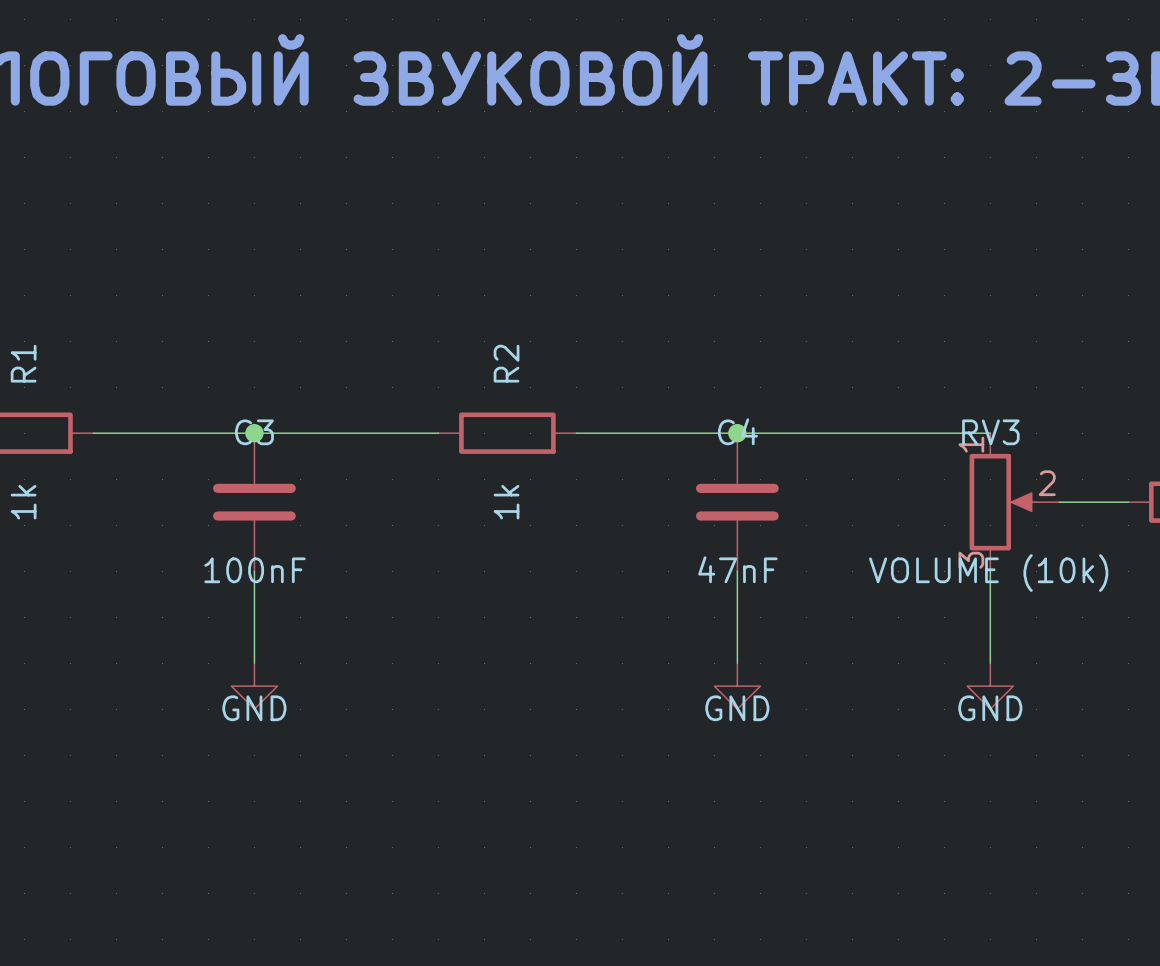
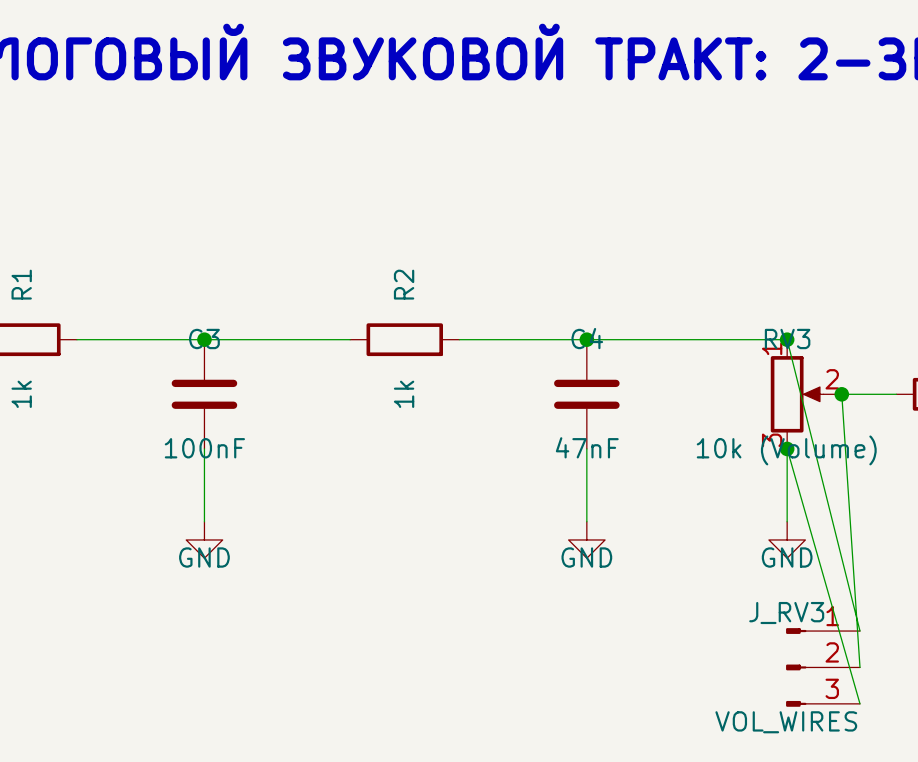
wire: none -> (787, 339) (859, 631)
junction: none -> (787, 339)
wire: none -> (841, 394) (859, 667)
junction: none -> (841, 394)
wire: none -> (787, 448) (859, 703)
junction: none -> (787, 448)
RV3 value: VOLUME (10k) (988, 573) -> 10k (Volume) (786, 450)
J_RV3: none -> VOL_WIRES (823, 667)

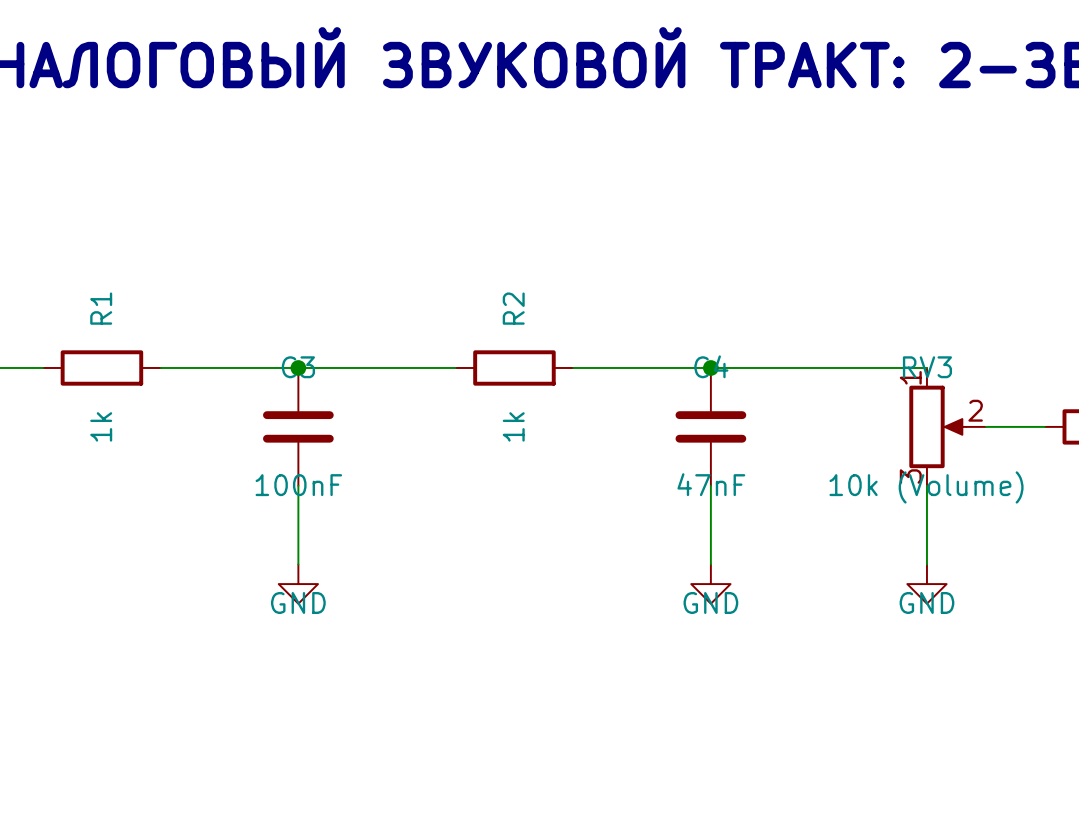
wire: (787, 339) (859, 631) -> none
junction: (787, 339) -> none
wire: (841, 394) (859, 667) -> none
junction: (841, 394) -> none
wire: (787, 448) (859, 703) -> none
junction: (787, 448) -> none
J_RV3: VOL_WIRES (823, 667) -> none

